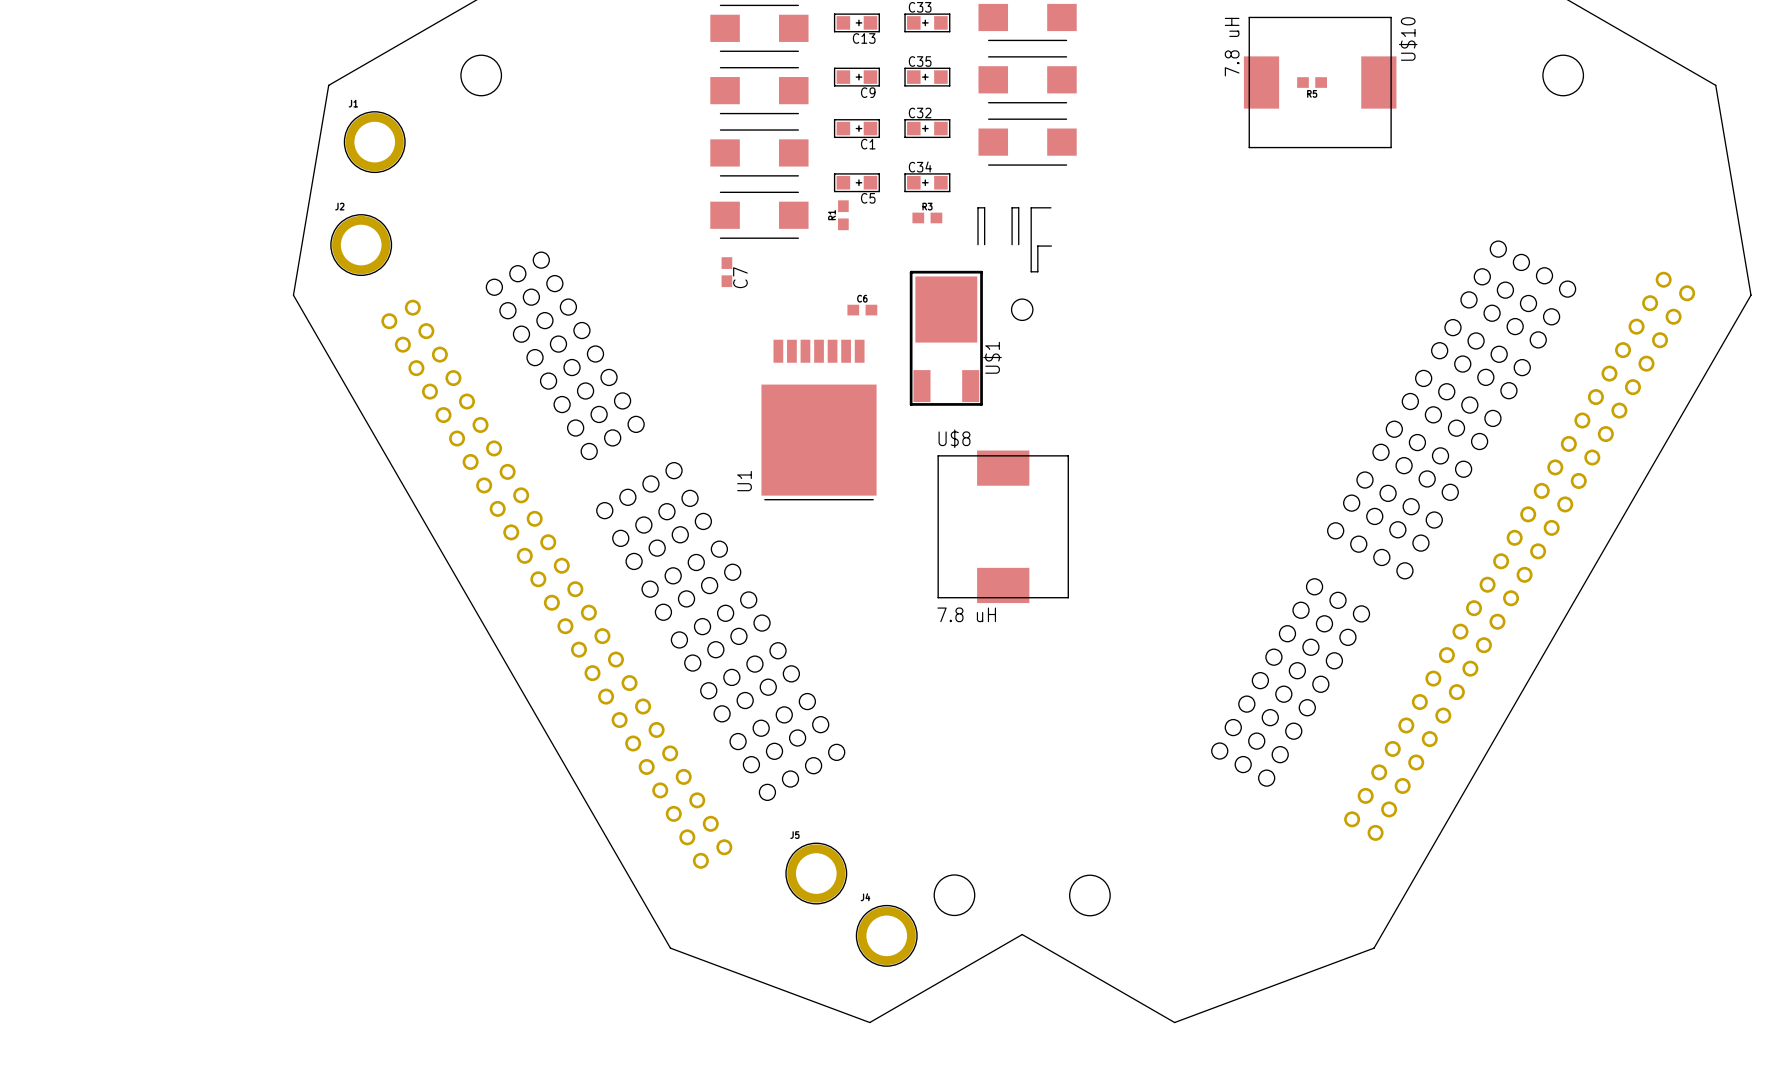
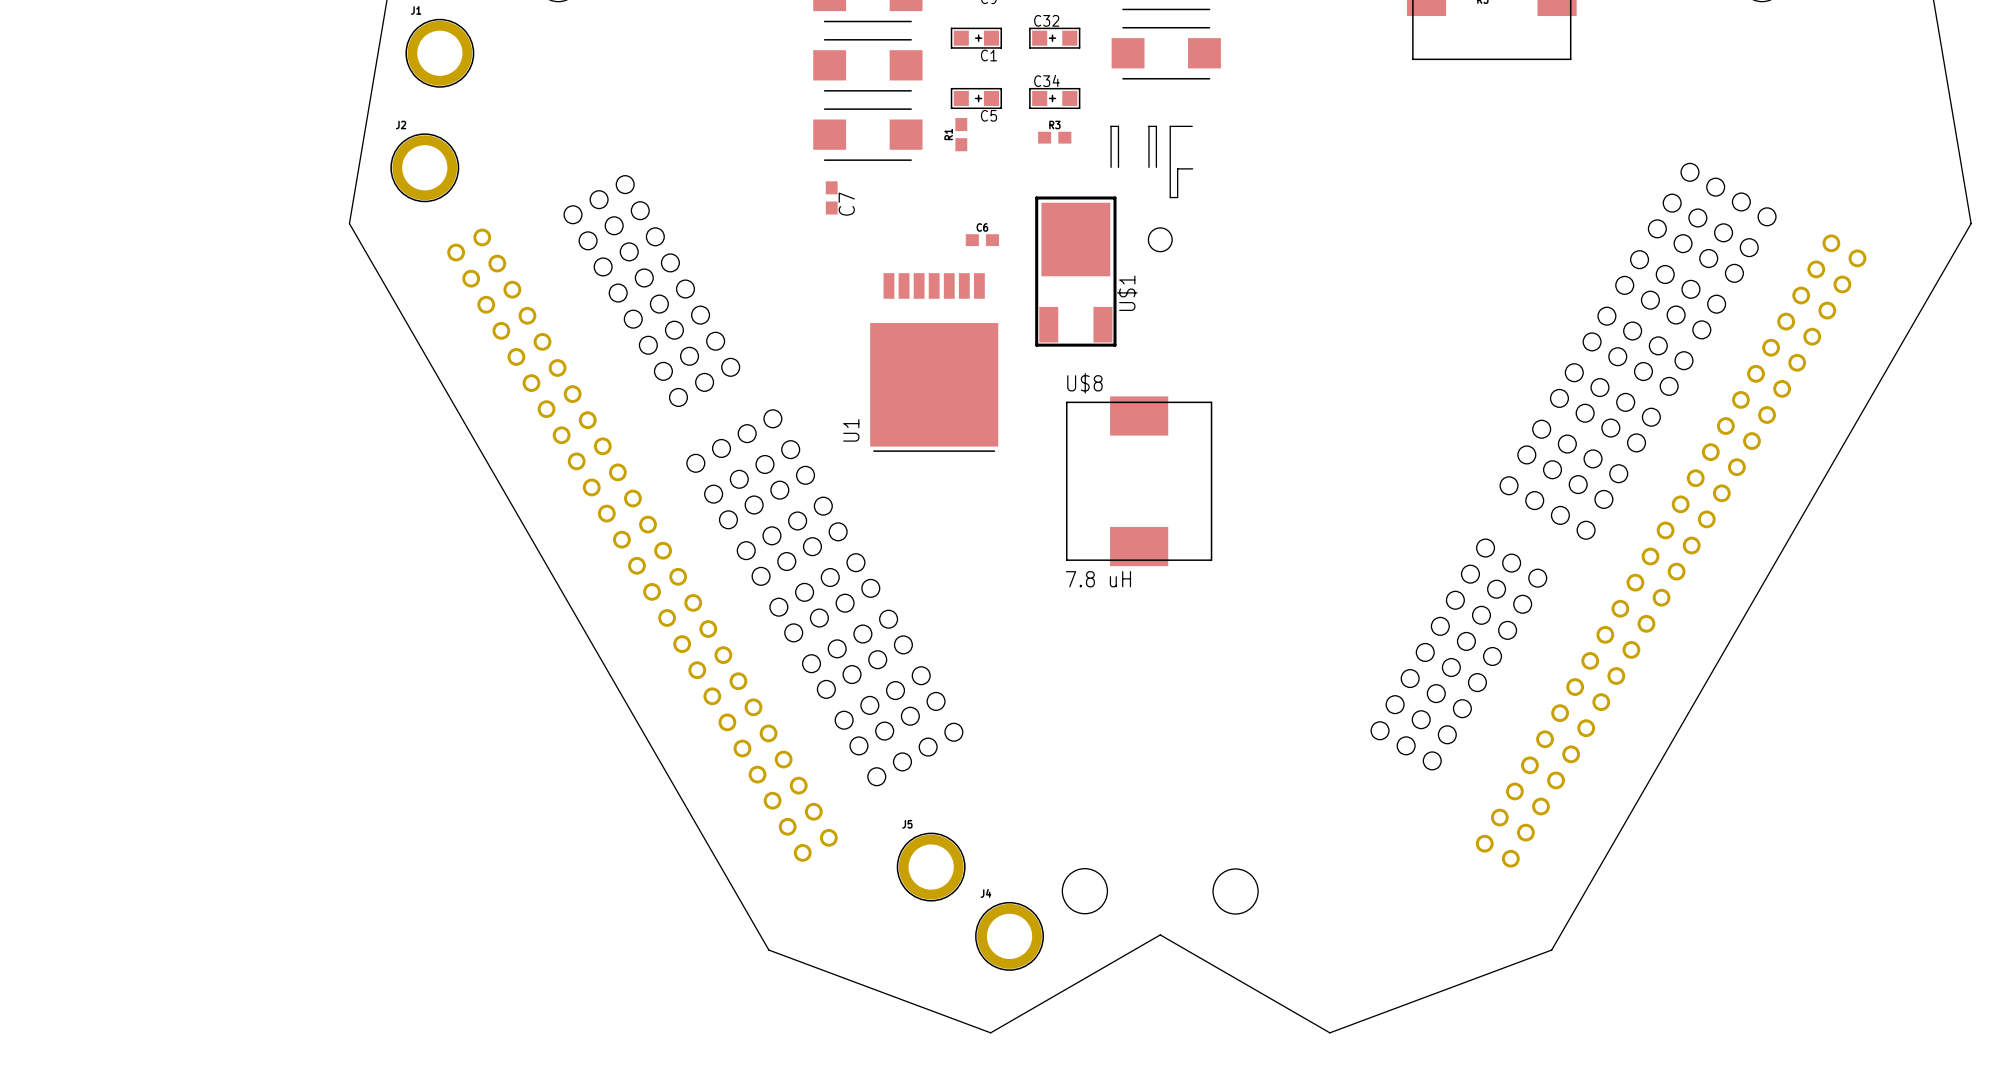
part position: (1519, 556) -> (1671, 551)

